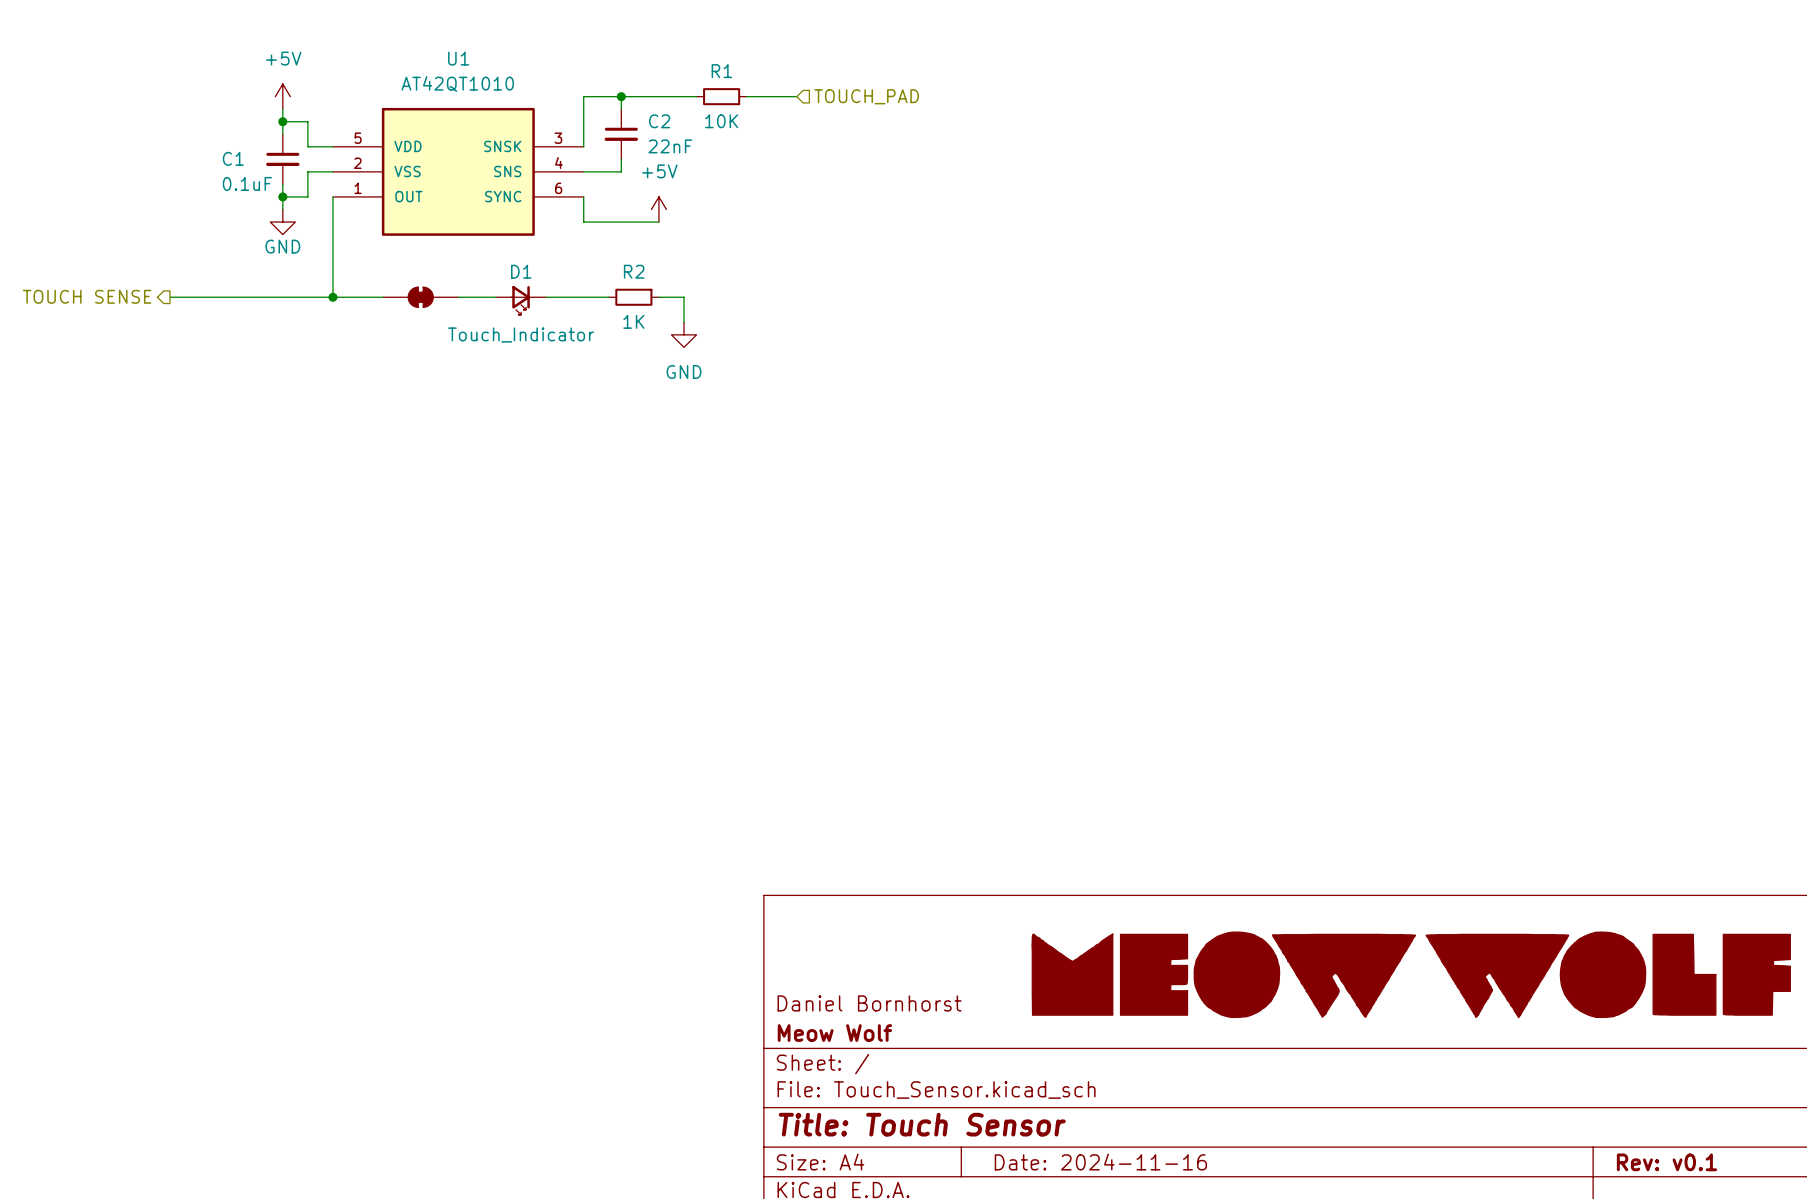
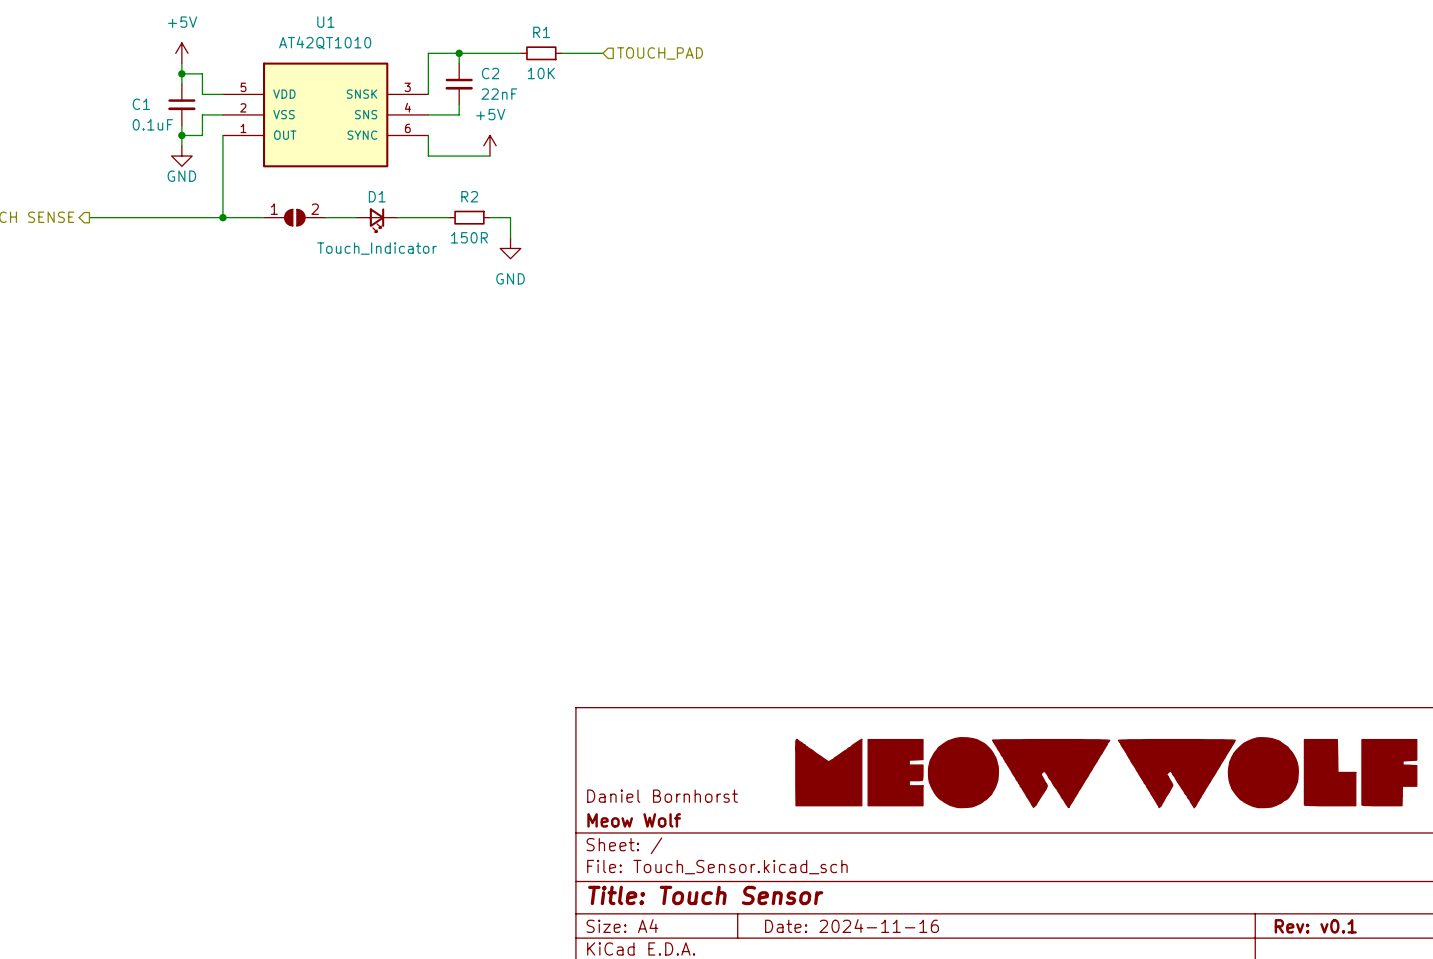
part symbol: [383, 287, 459, 308] -> [264, 209, 326, 226]
R2 value: 1K (633, 321) -> 150R (469, 237)

